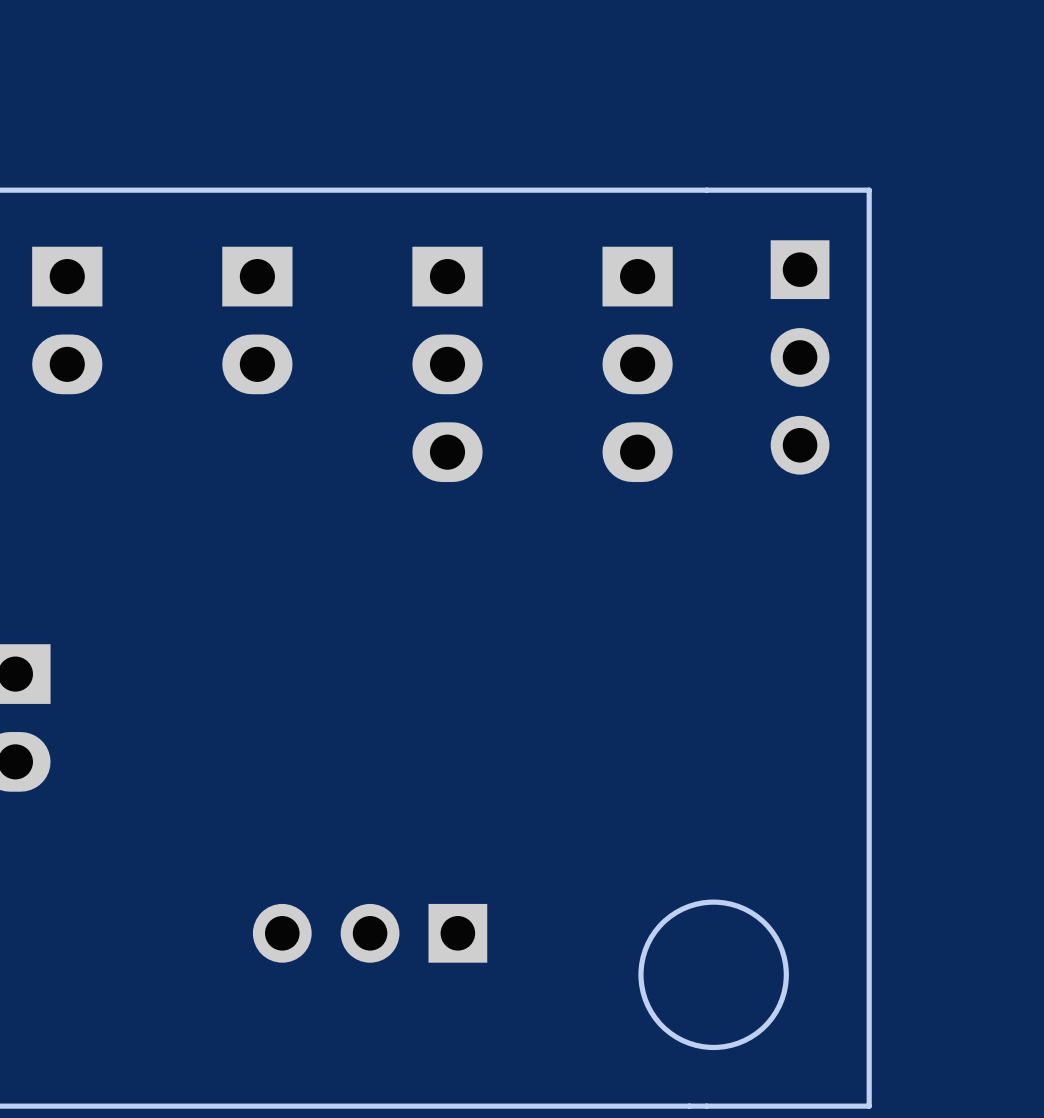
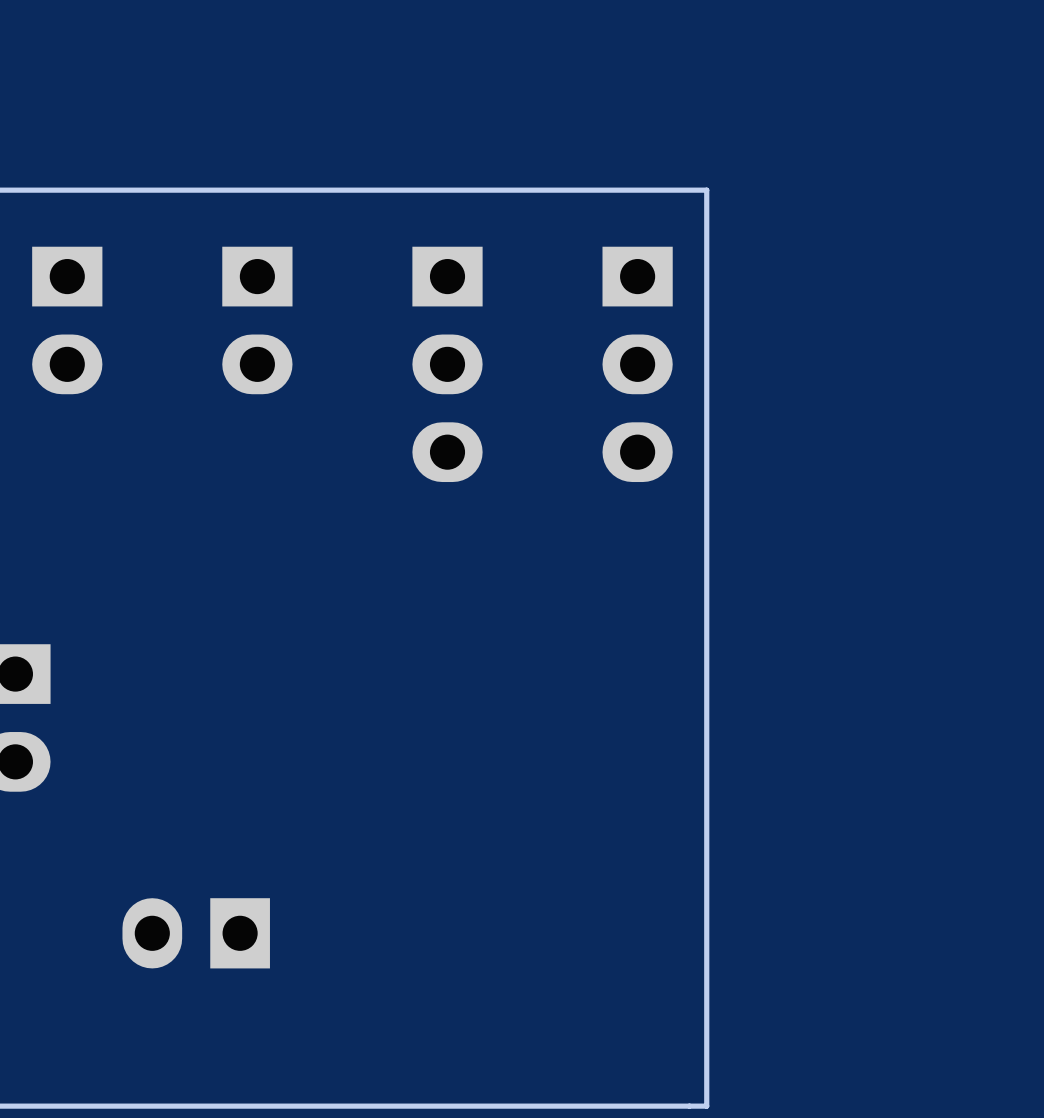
board edge: (706, 190) (869, 190) (869, 1106) (706, 1106) -> (706, 190) (706, 1106)
part: (800, 357) -> none
round board edge: [638, 899, 789, 1051] -> none
part: none -> (196, 933)
part: (370, 933) -> none

